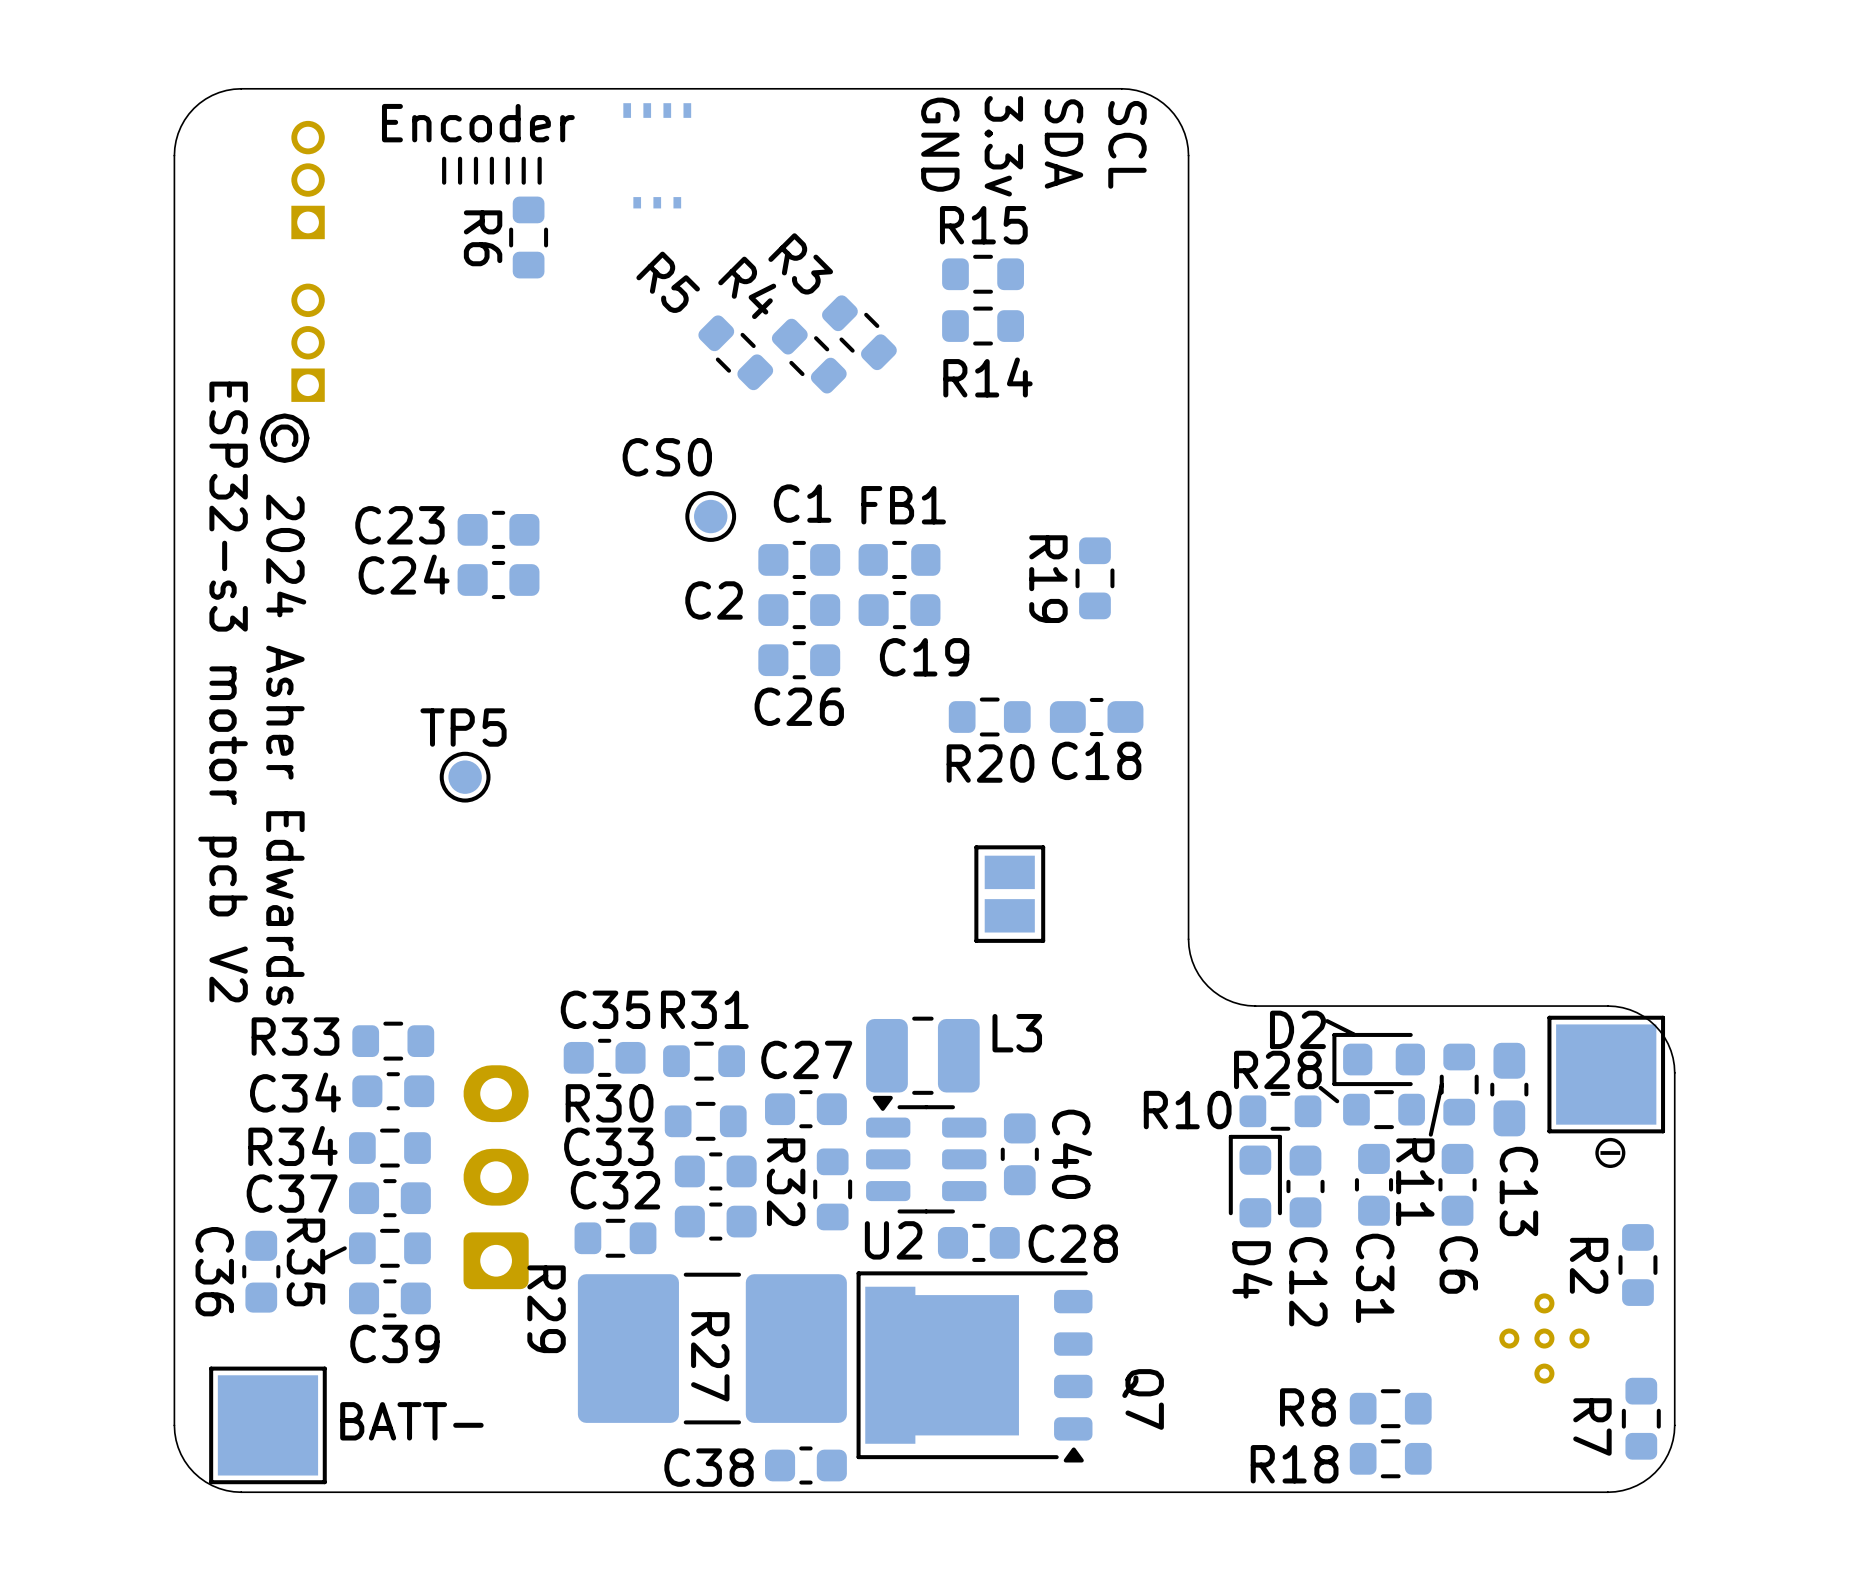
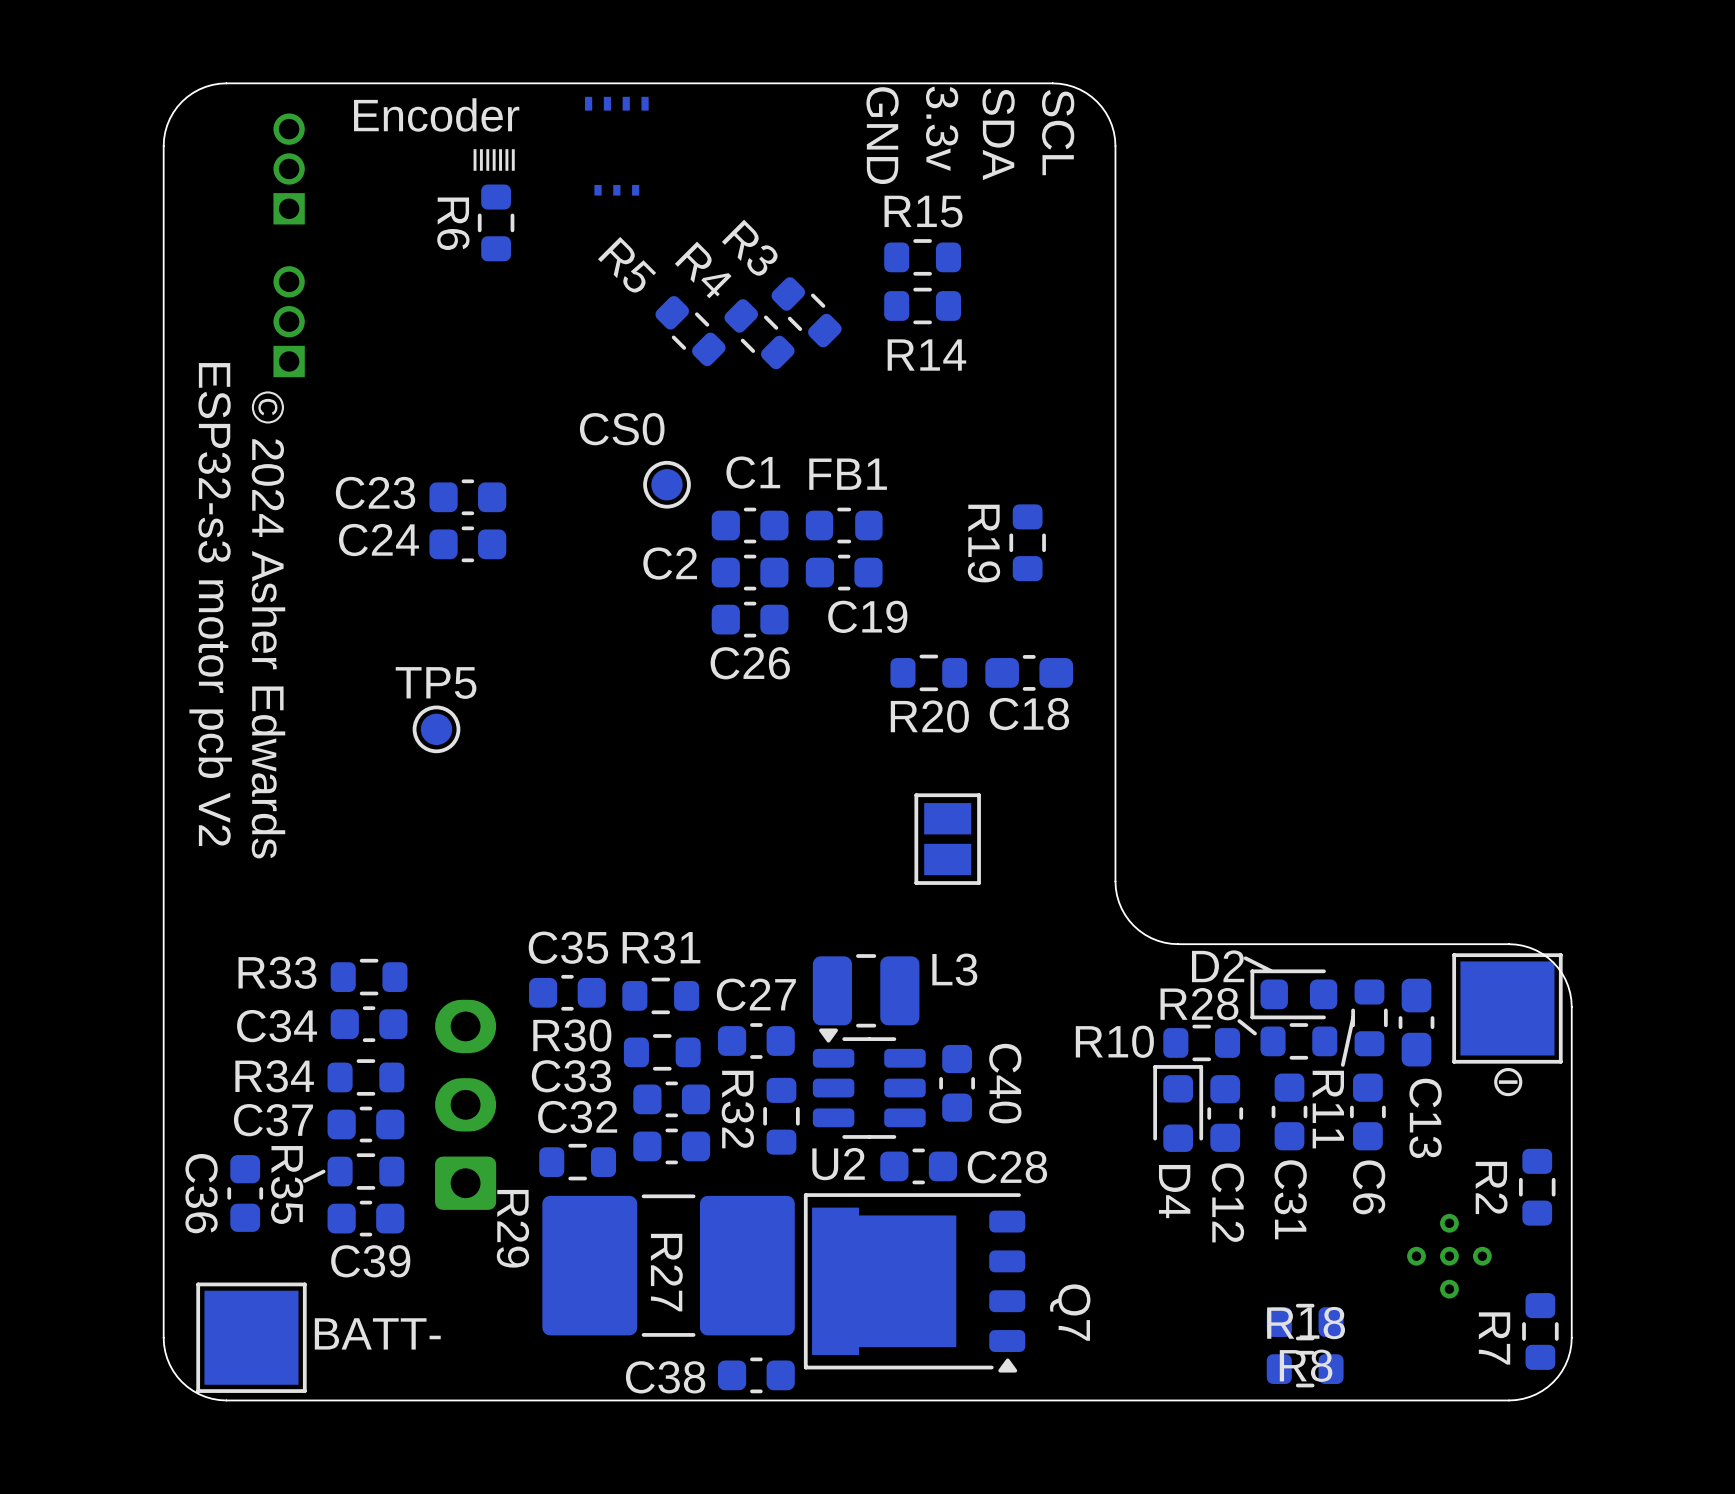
text position: ESP32-s3 motor pcb V2 (223, 691) -> ESP32-s3 motor pcb V2 (210, 604)
text position: © 2024 Asher Edwards (284, 709) -> © 2024 Asher Edwards (268, 624)
R8 name position: R8 (1307, 1407) -> R8 (1306, 1365)
R18 name position: R18 (1294, 1464) -> R18 (1306, 1323)

